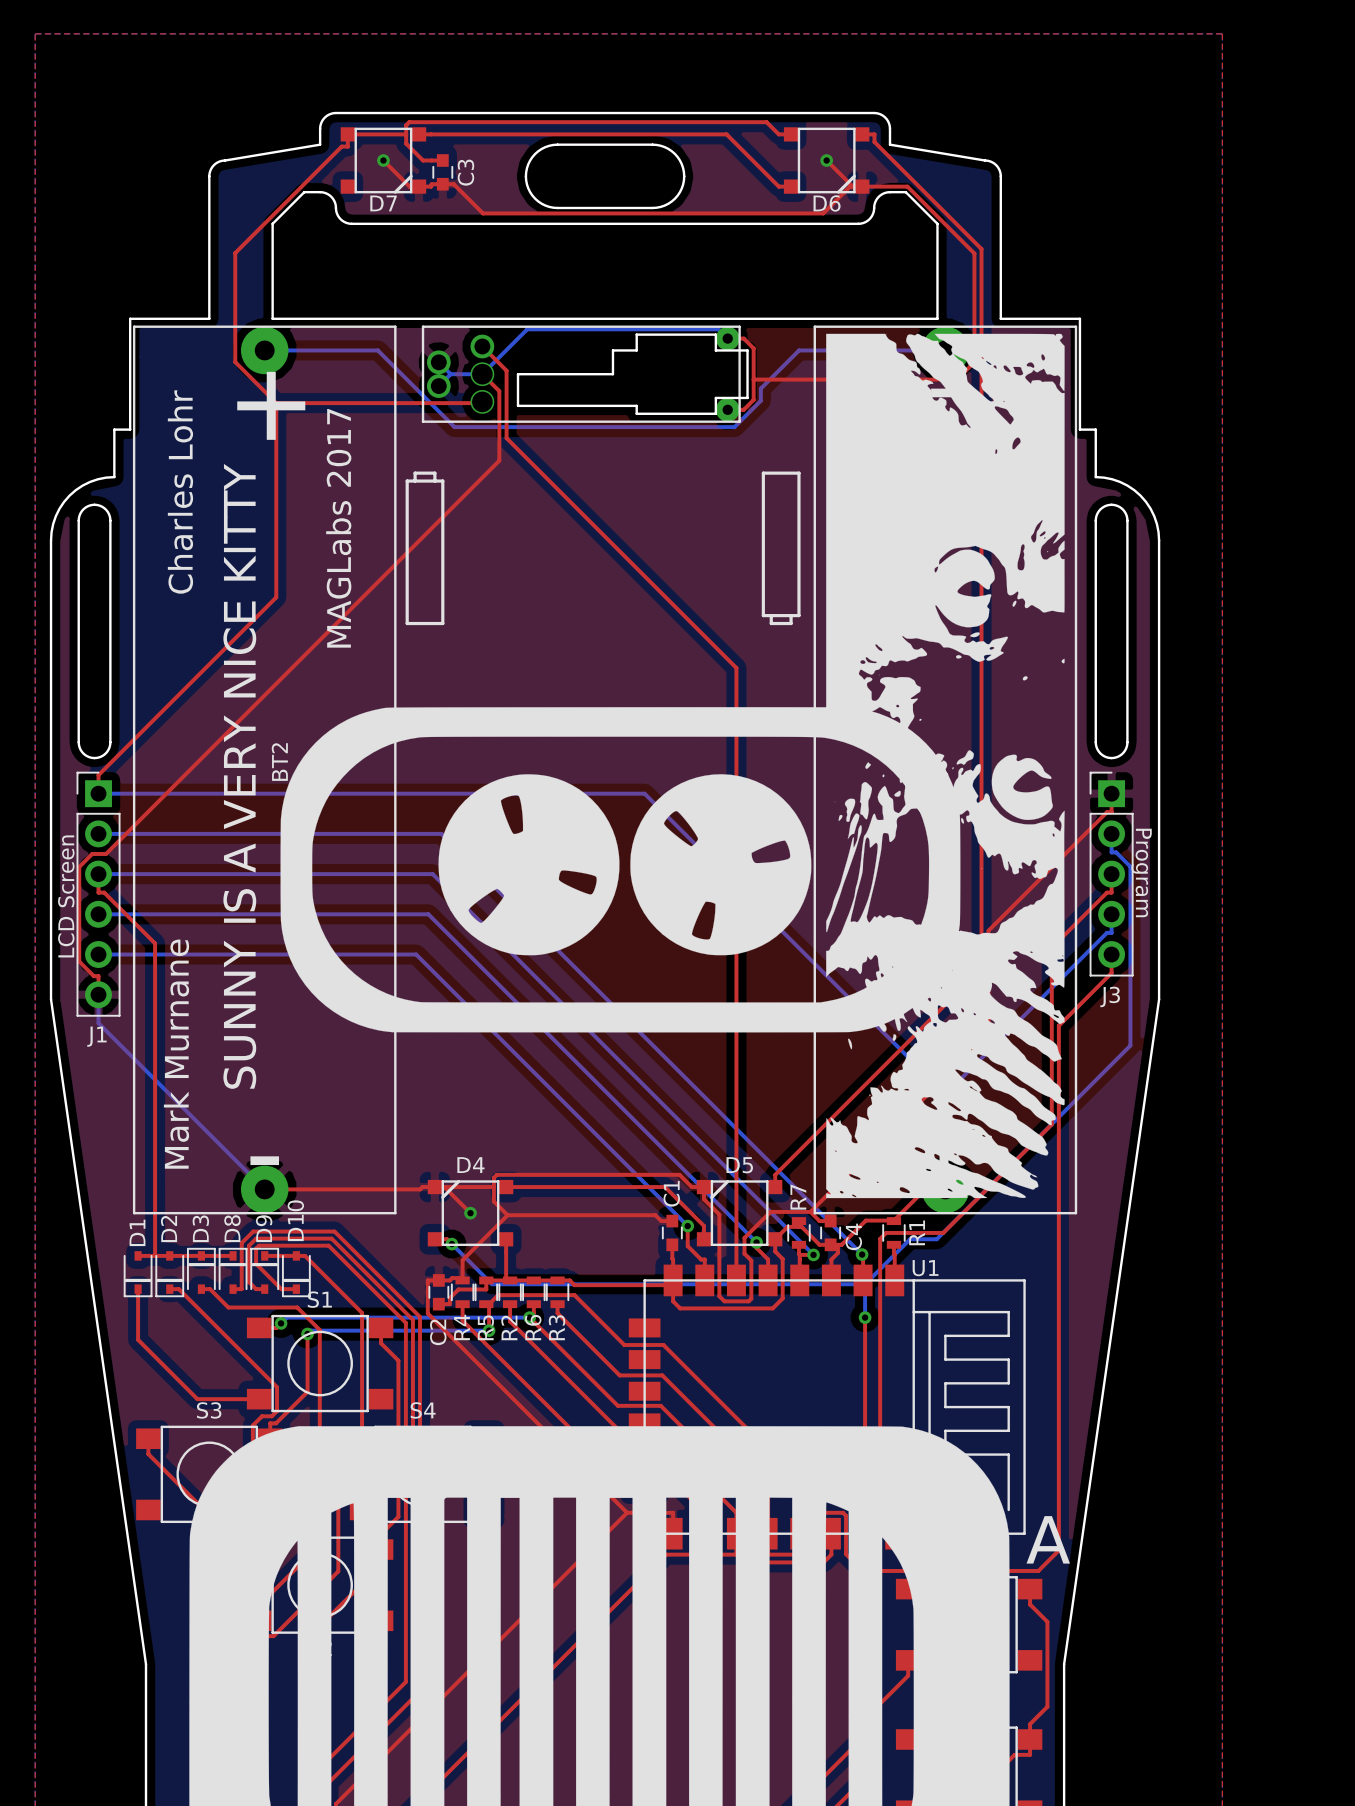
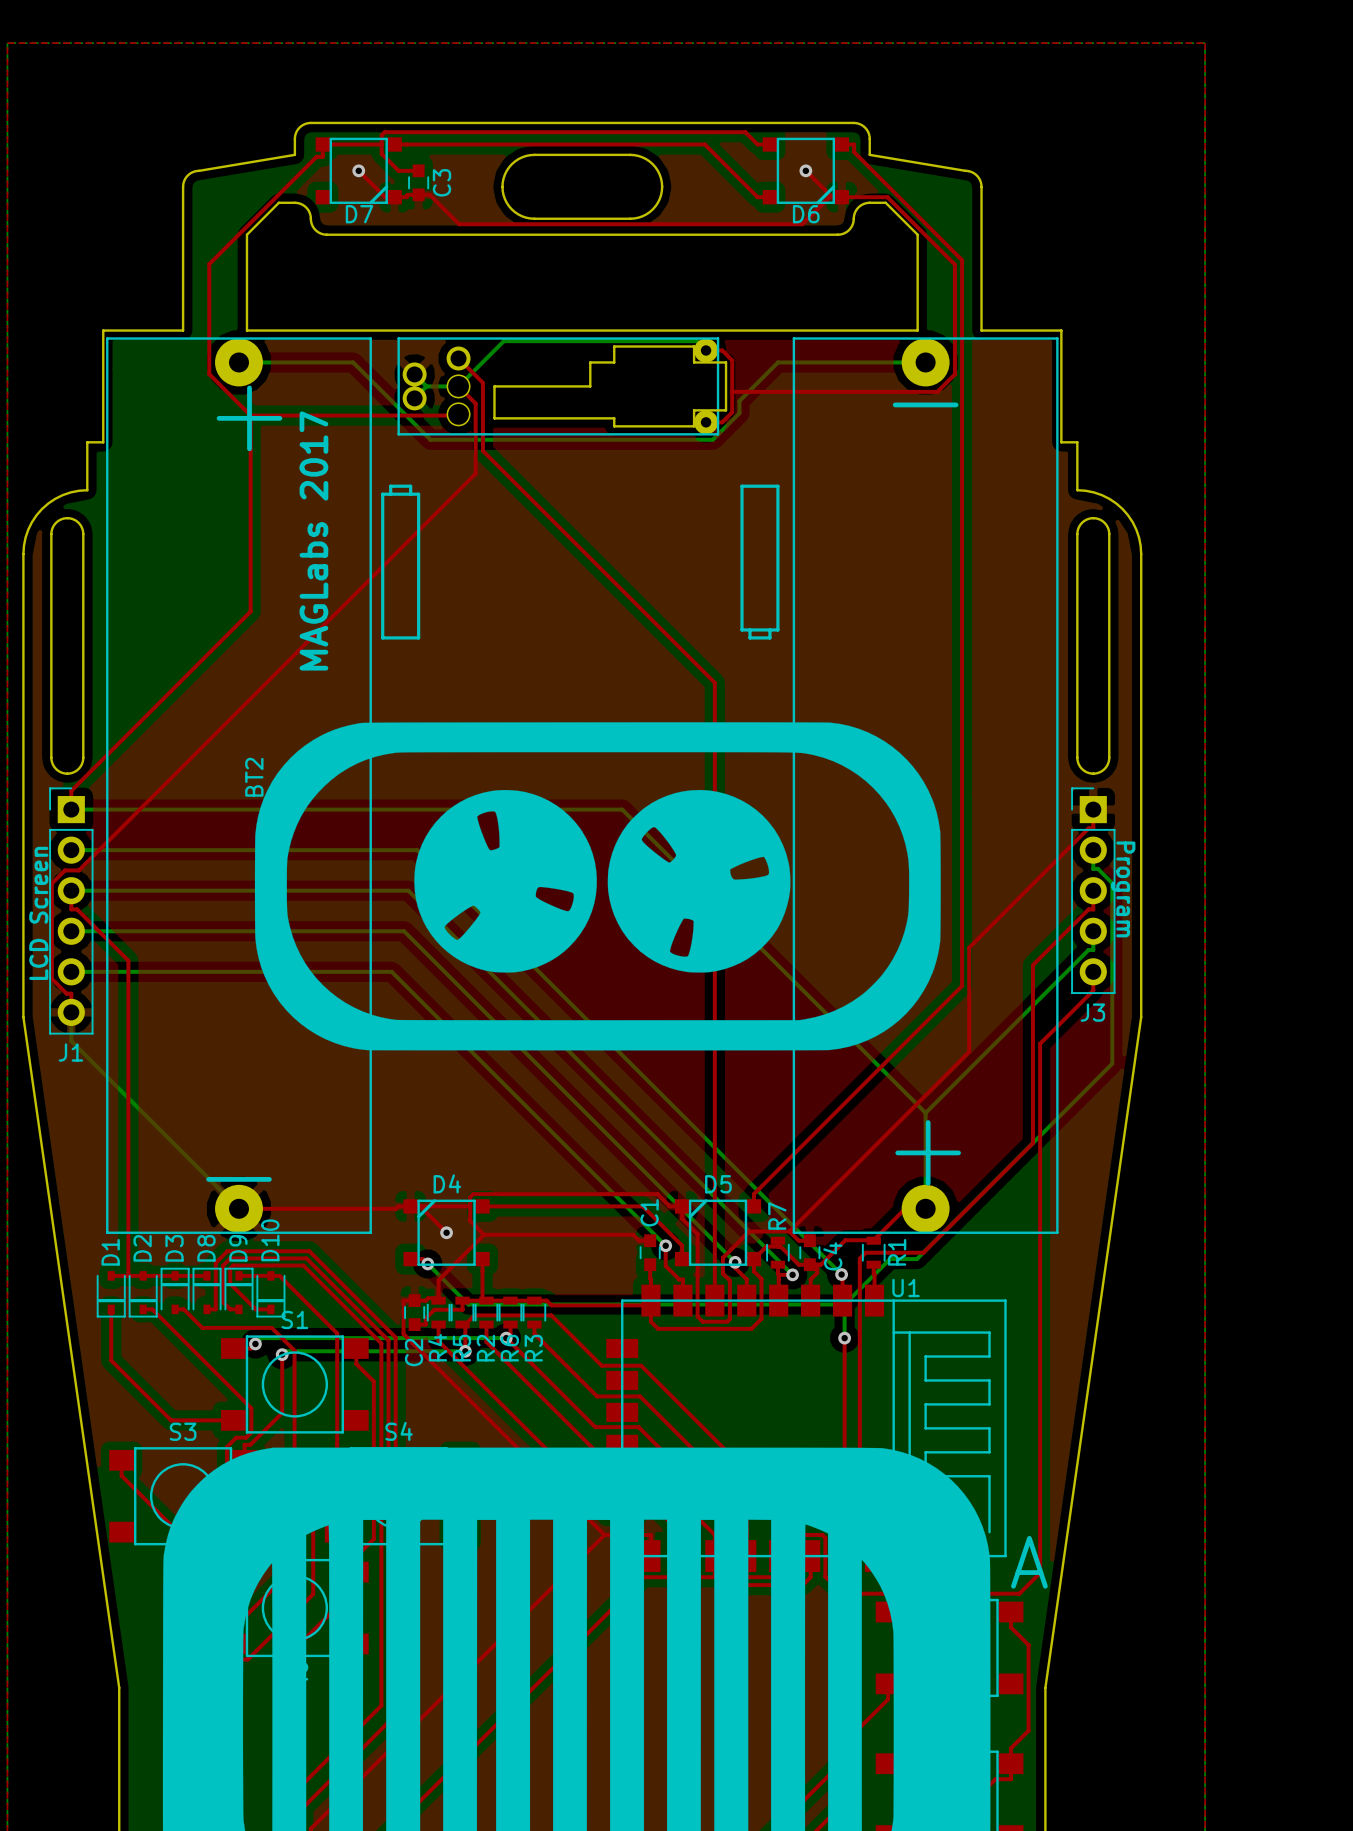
drawing: [826, 333, 1065, 1199] -> none
text: Charles Lohr (180, 492) -> none
text: SUNNY IS A VERY NICE KITTY (239, 776) -> none
text: Mark Murnane (176, 1054) -> none

